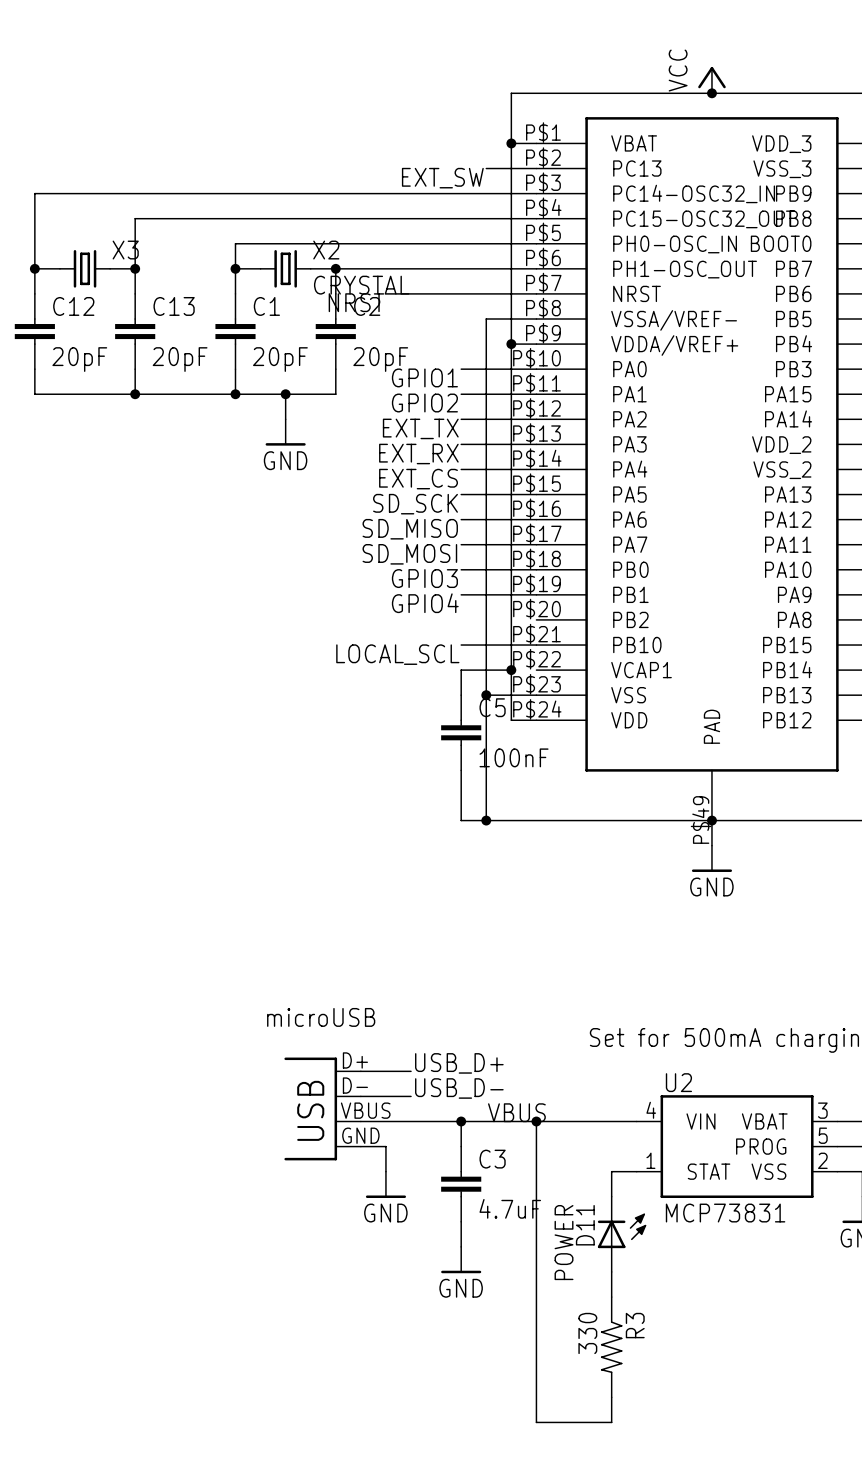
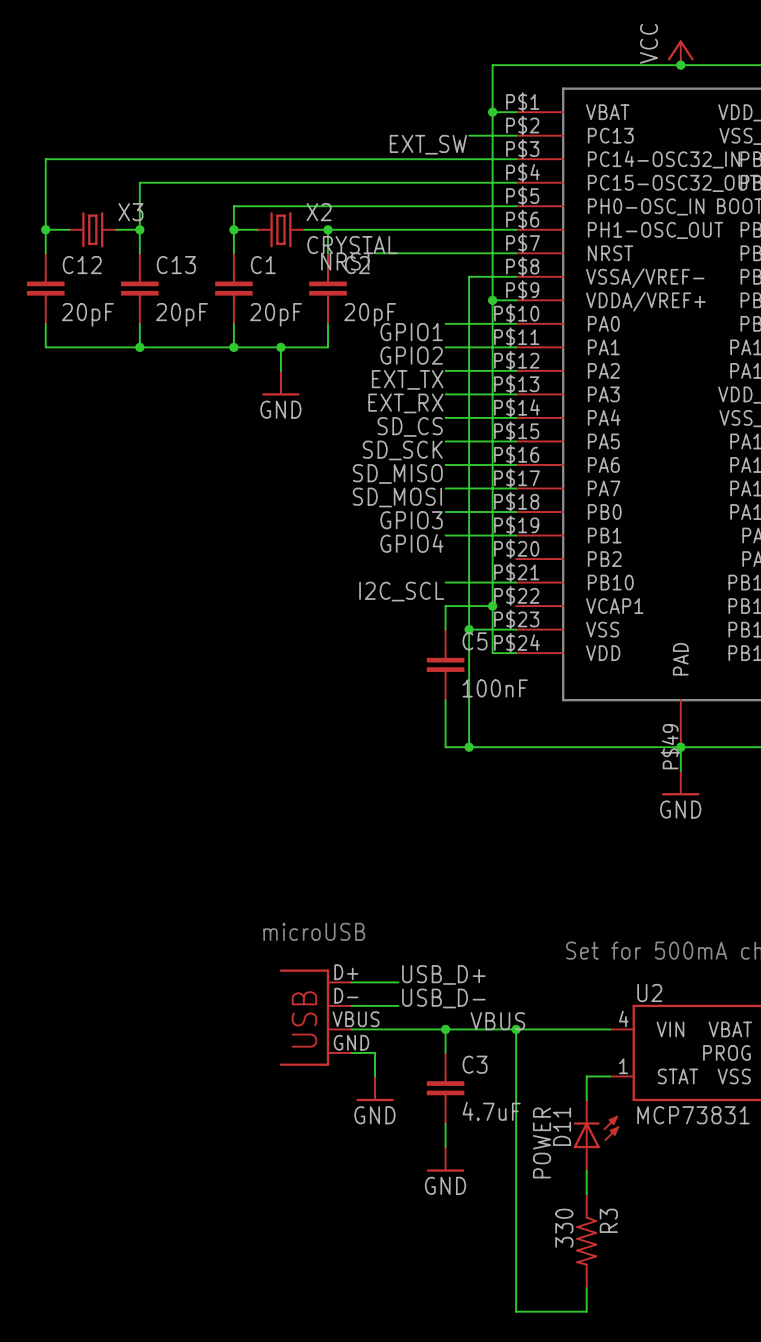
label: EXT_CS (418, 479) -> SD_CS (410, 426)
label: LOCAL_SCL (397, 654) -> I2C_SCL (401, 591)

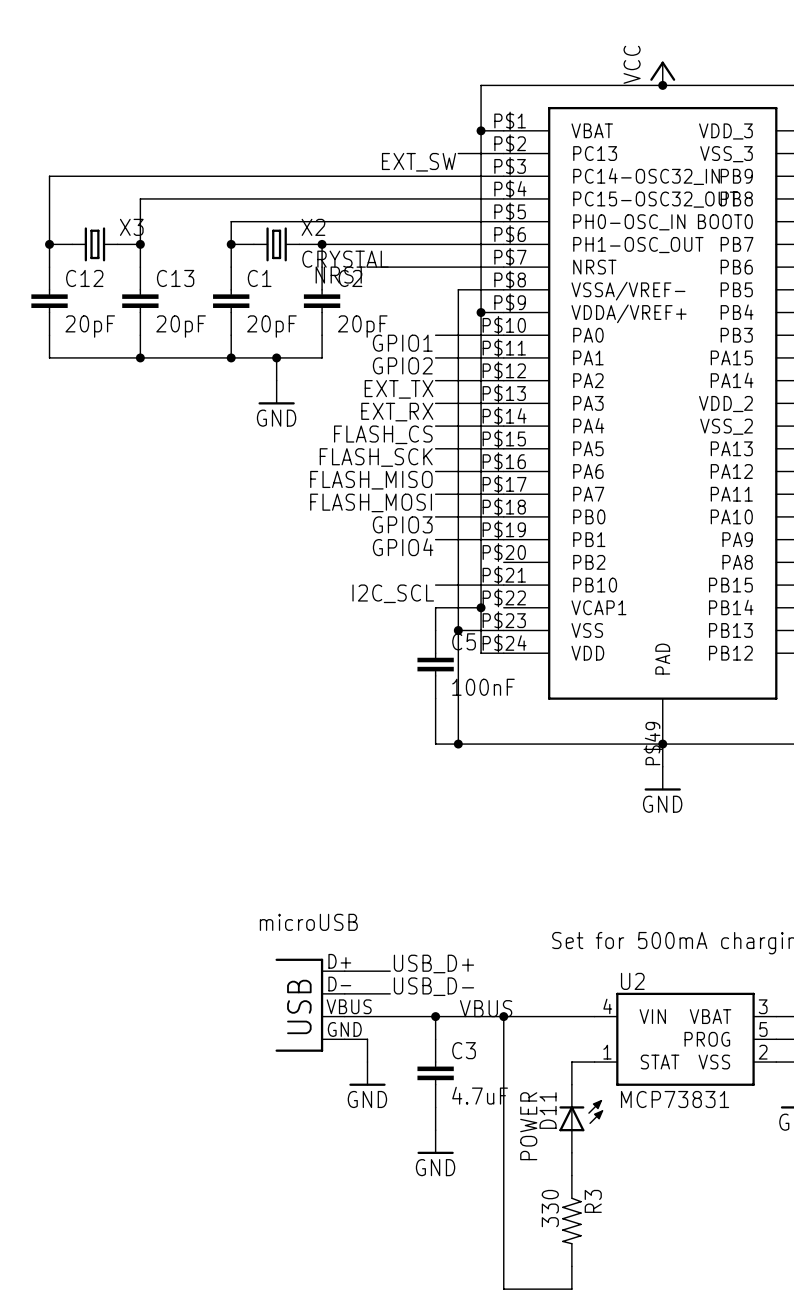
label: SD_CS (410, 426) -> FLASH_CS (383, 434)
label: SD_SCK (402, 450) -> FLASH_SCK (376, 457)
label: SD_MISO (397, 473) -> FLASH_MISO (371, 480)
label: SD_MOSI (397, 497) -> FLASH_MOSI (371, 502)

